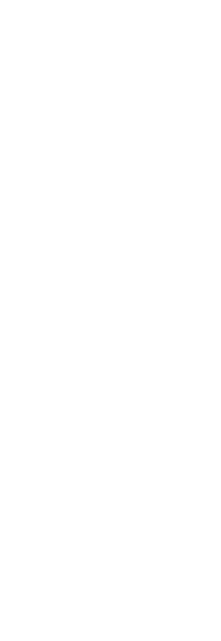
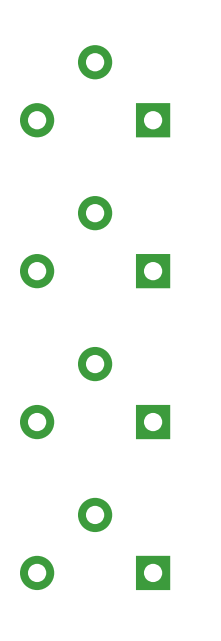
part: none -> (95, 91)
part: none -> (95, 242)
part: none -> (95, 393)
part: none -> (95, 543)

